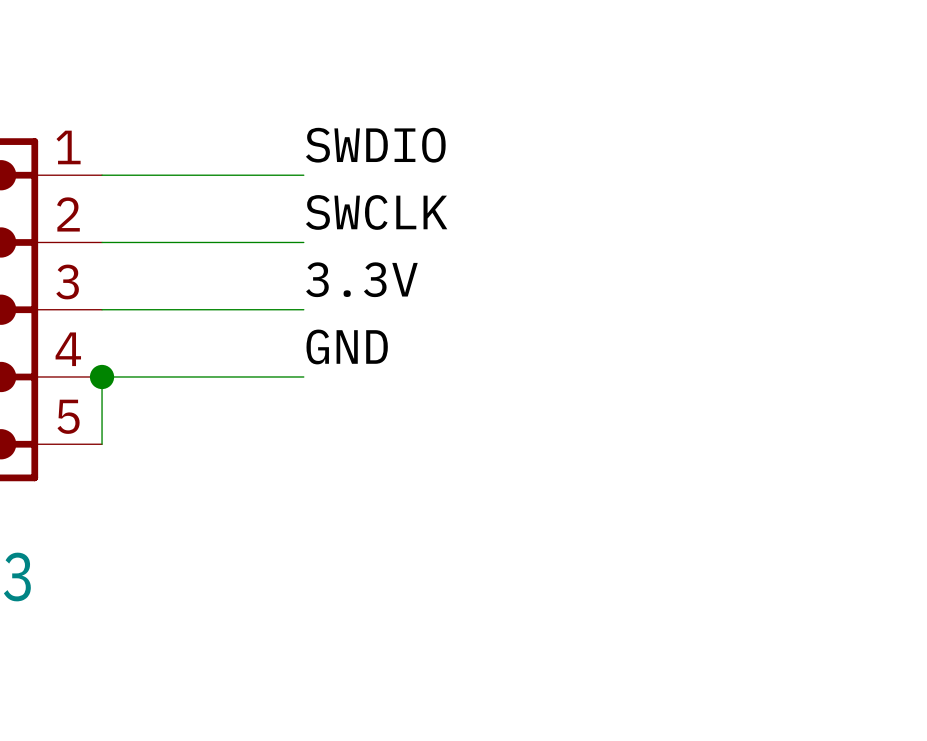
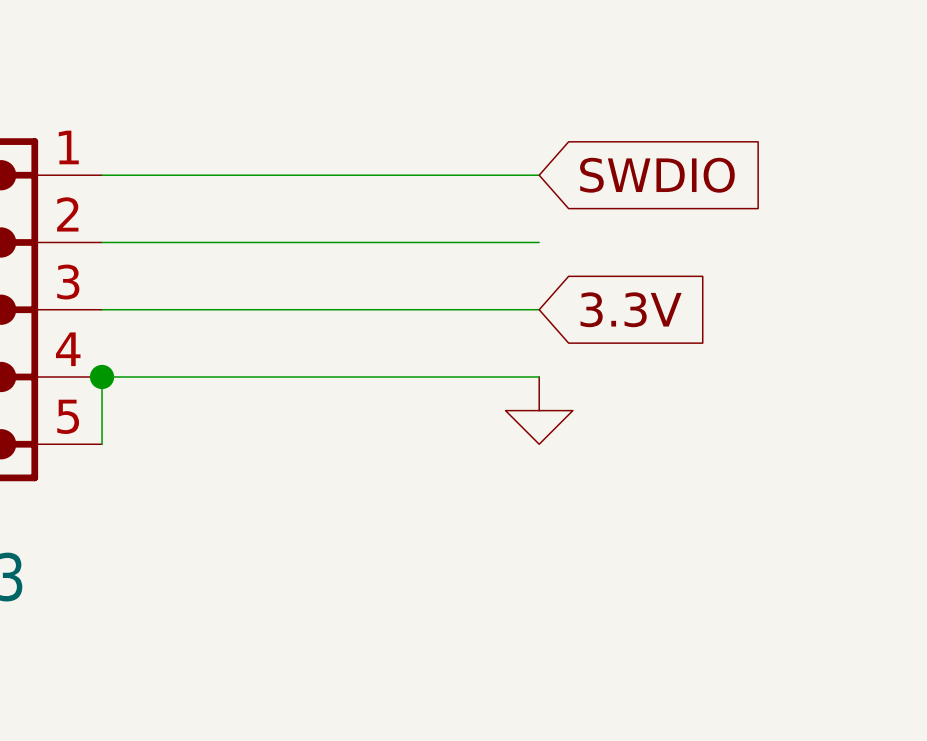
label: SWDIO (375, 145) -> none
wire: none -> (303, 175) (539, 175)
global label: none -> SWDIO (657, 175)
label: SWCLK (376, 212) -> none
wire: none -> (303, 242) (539, 242)
label: 3.3V (361, 279) -> none
wire: none -> (303, 309) (539, 309)
global label: none -> 3.3V (631, 309)
label: GND (347, 346) -> none
wire: none -> (303, 376) (539, 376)
power symbol: none -> (539, 410)

